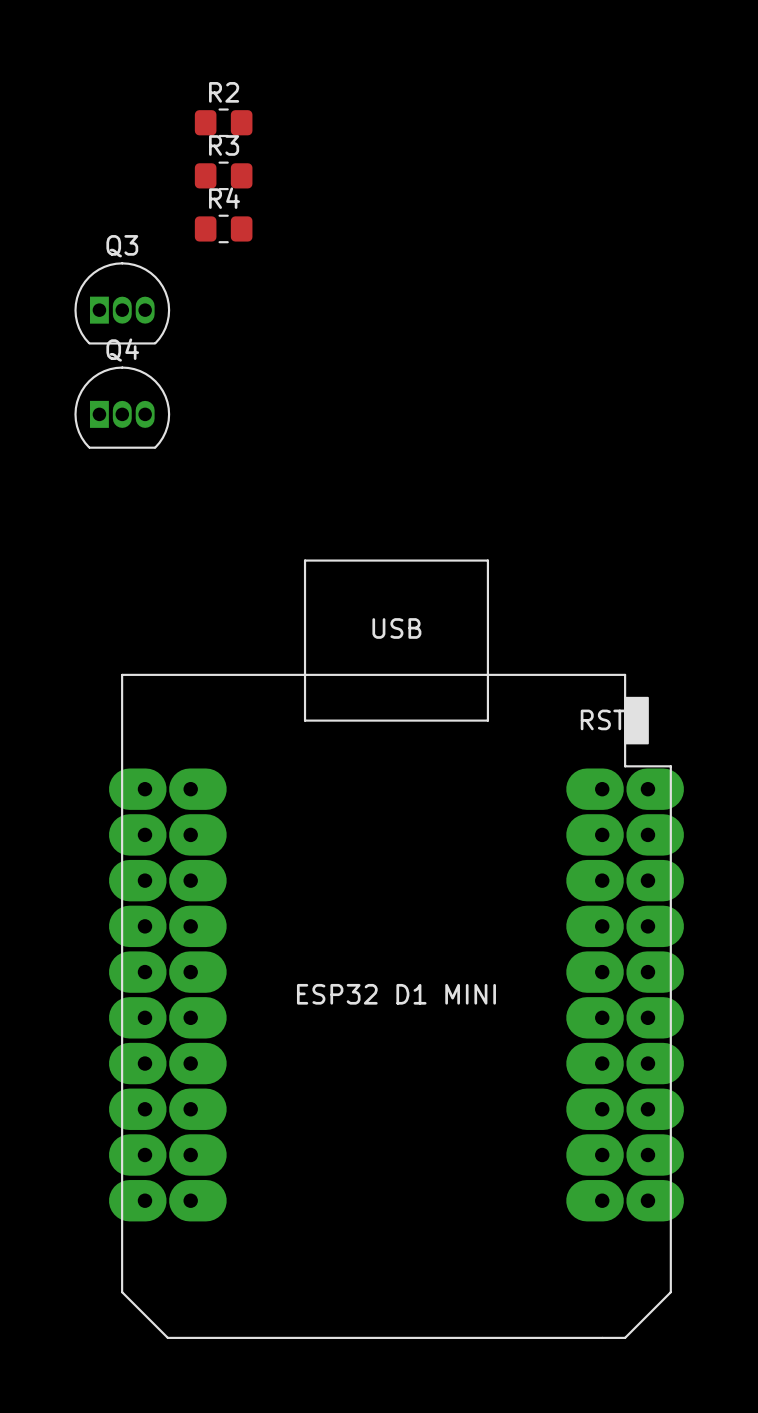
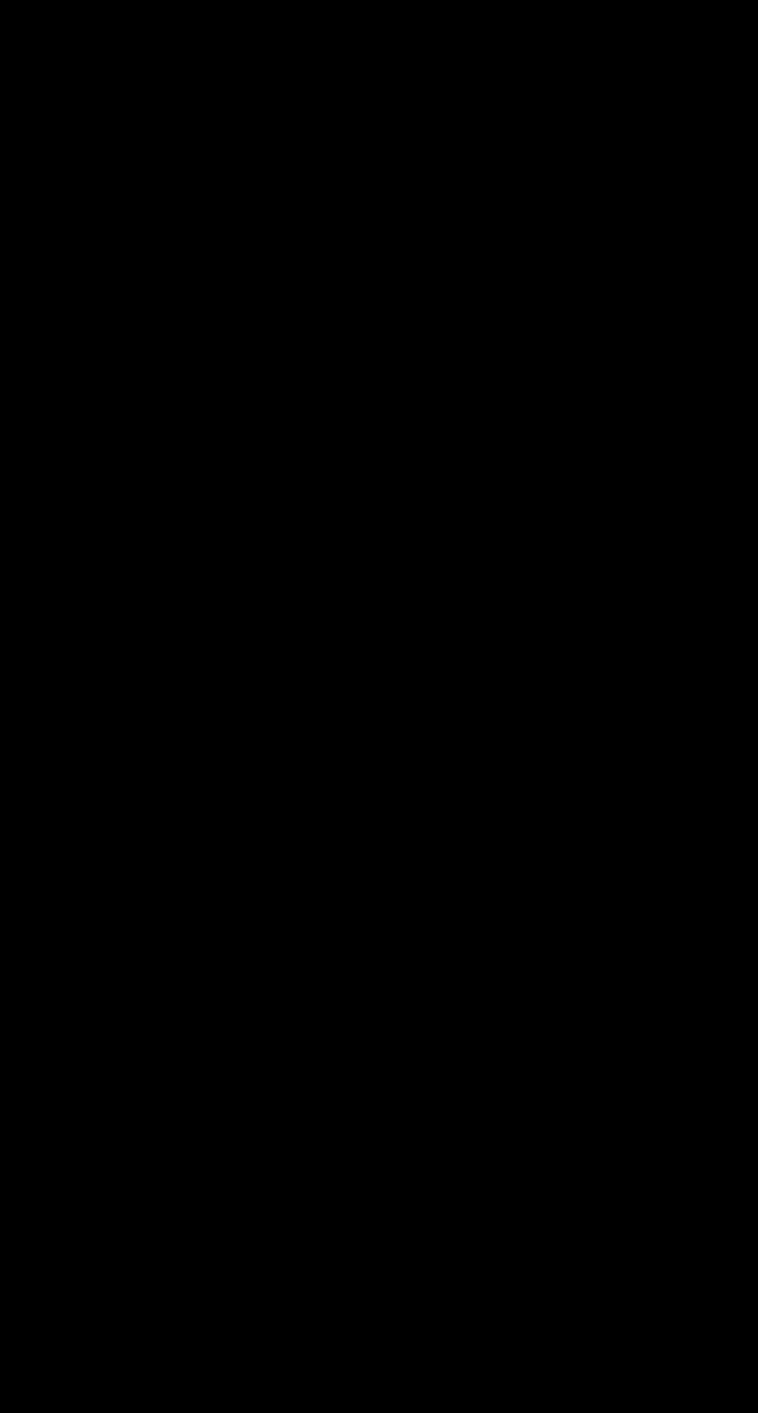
R2: (223, 122) -> none
R3: (223, 175) -> none
R4: (223, 228) -> none
Q3: (122, 303) -> none
Q4: (122, 407) -> none
part: ESP32 D1 MINI (396, 949) -> none

